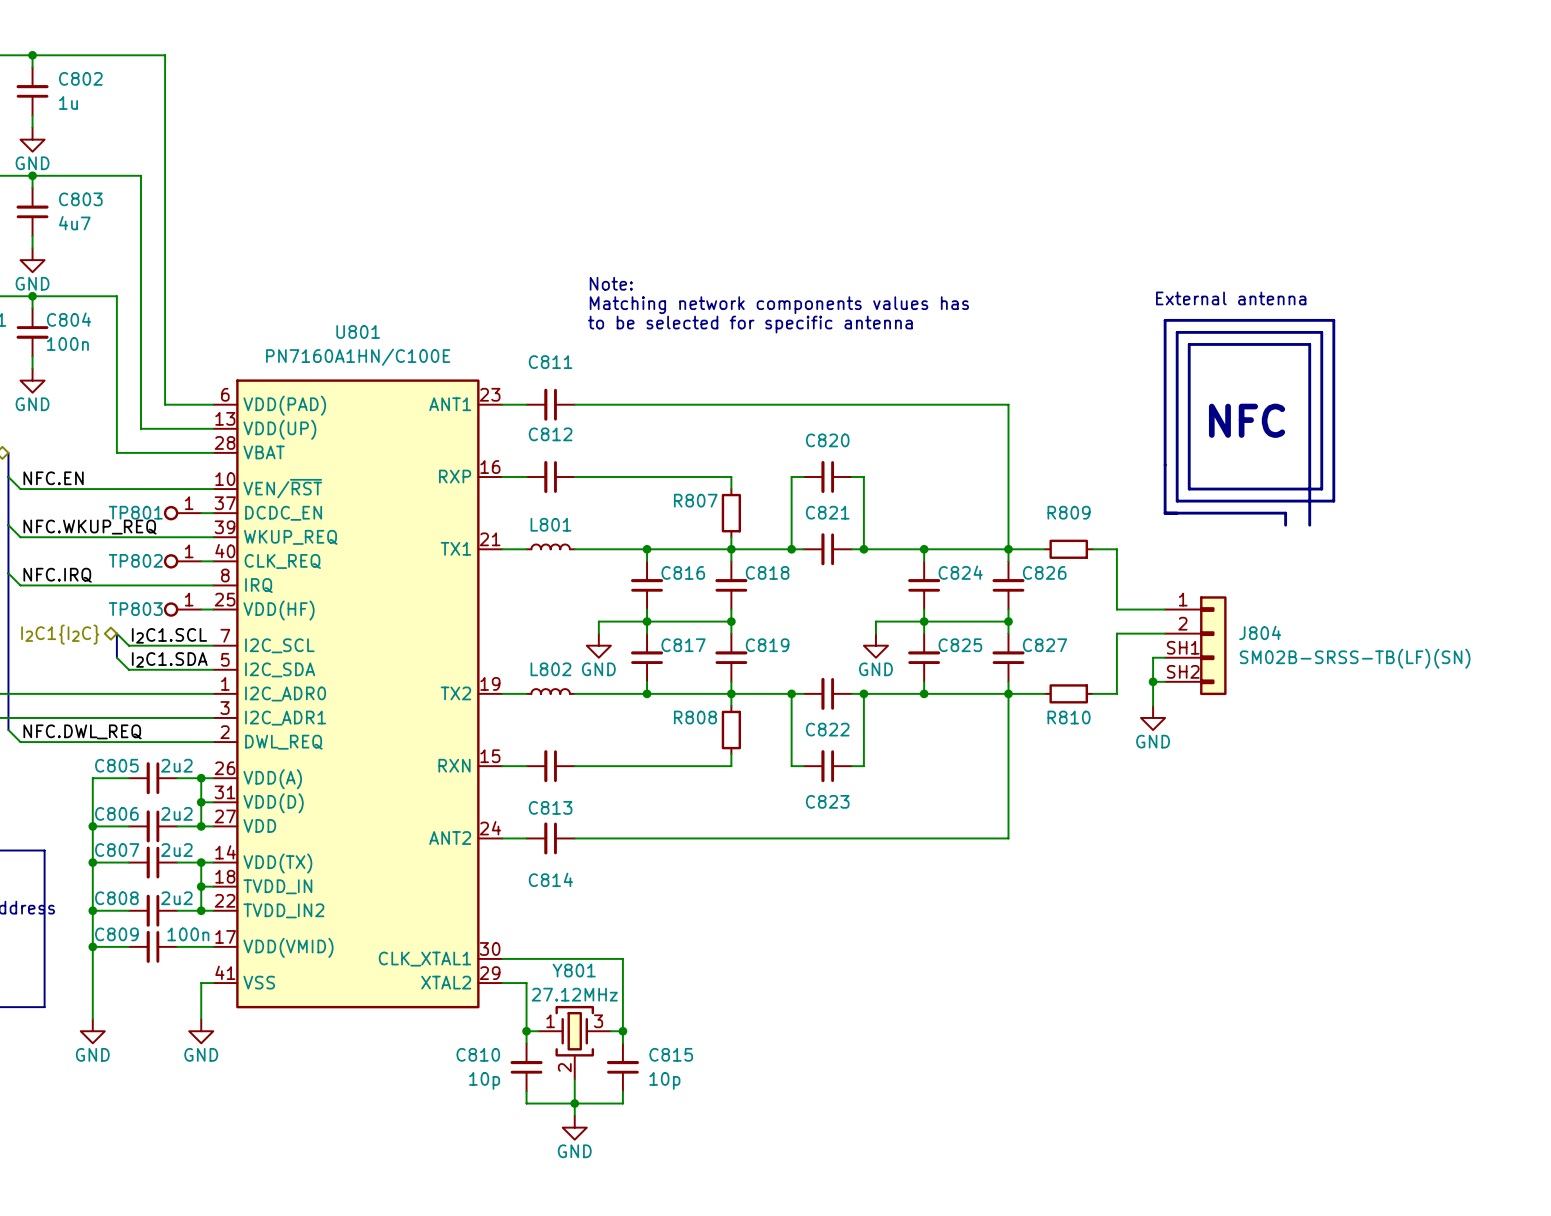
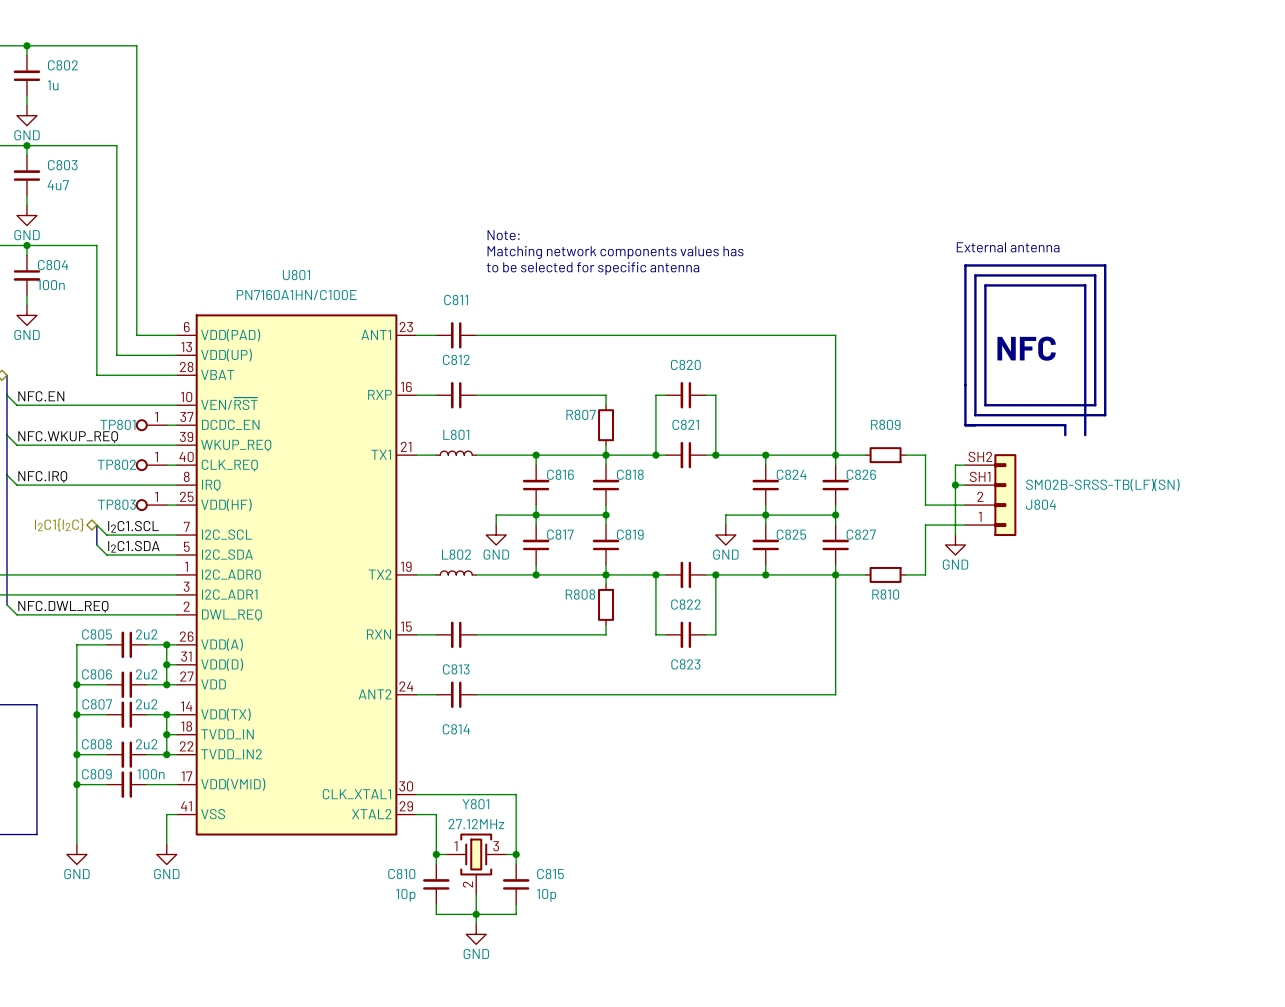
wire: none -> (965, 465) (955, 465) (955, 535)
junction: none -> (955, 485)
J804 flip: as is (1213, 645) -> up-down (1005, 495)
wire: (1165, 657) (1153, 657) (1153, 705) -> none
wire: (1153, 681) (1165, 681) -> (955, 485) (965, 485)
junction: (1153, 681) -> none
power symbol position: GND (1153, 717) -> GND (955, 545)

